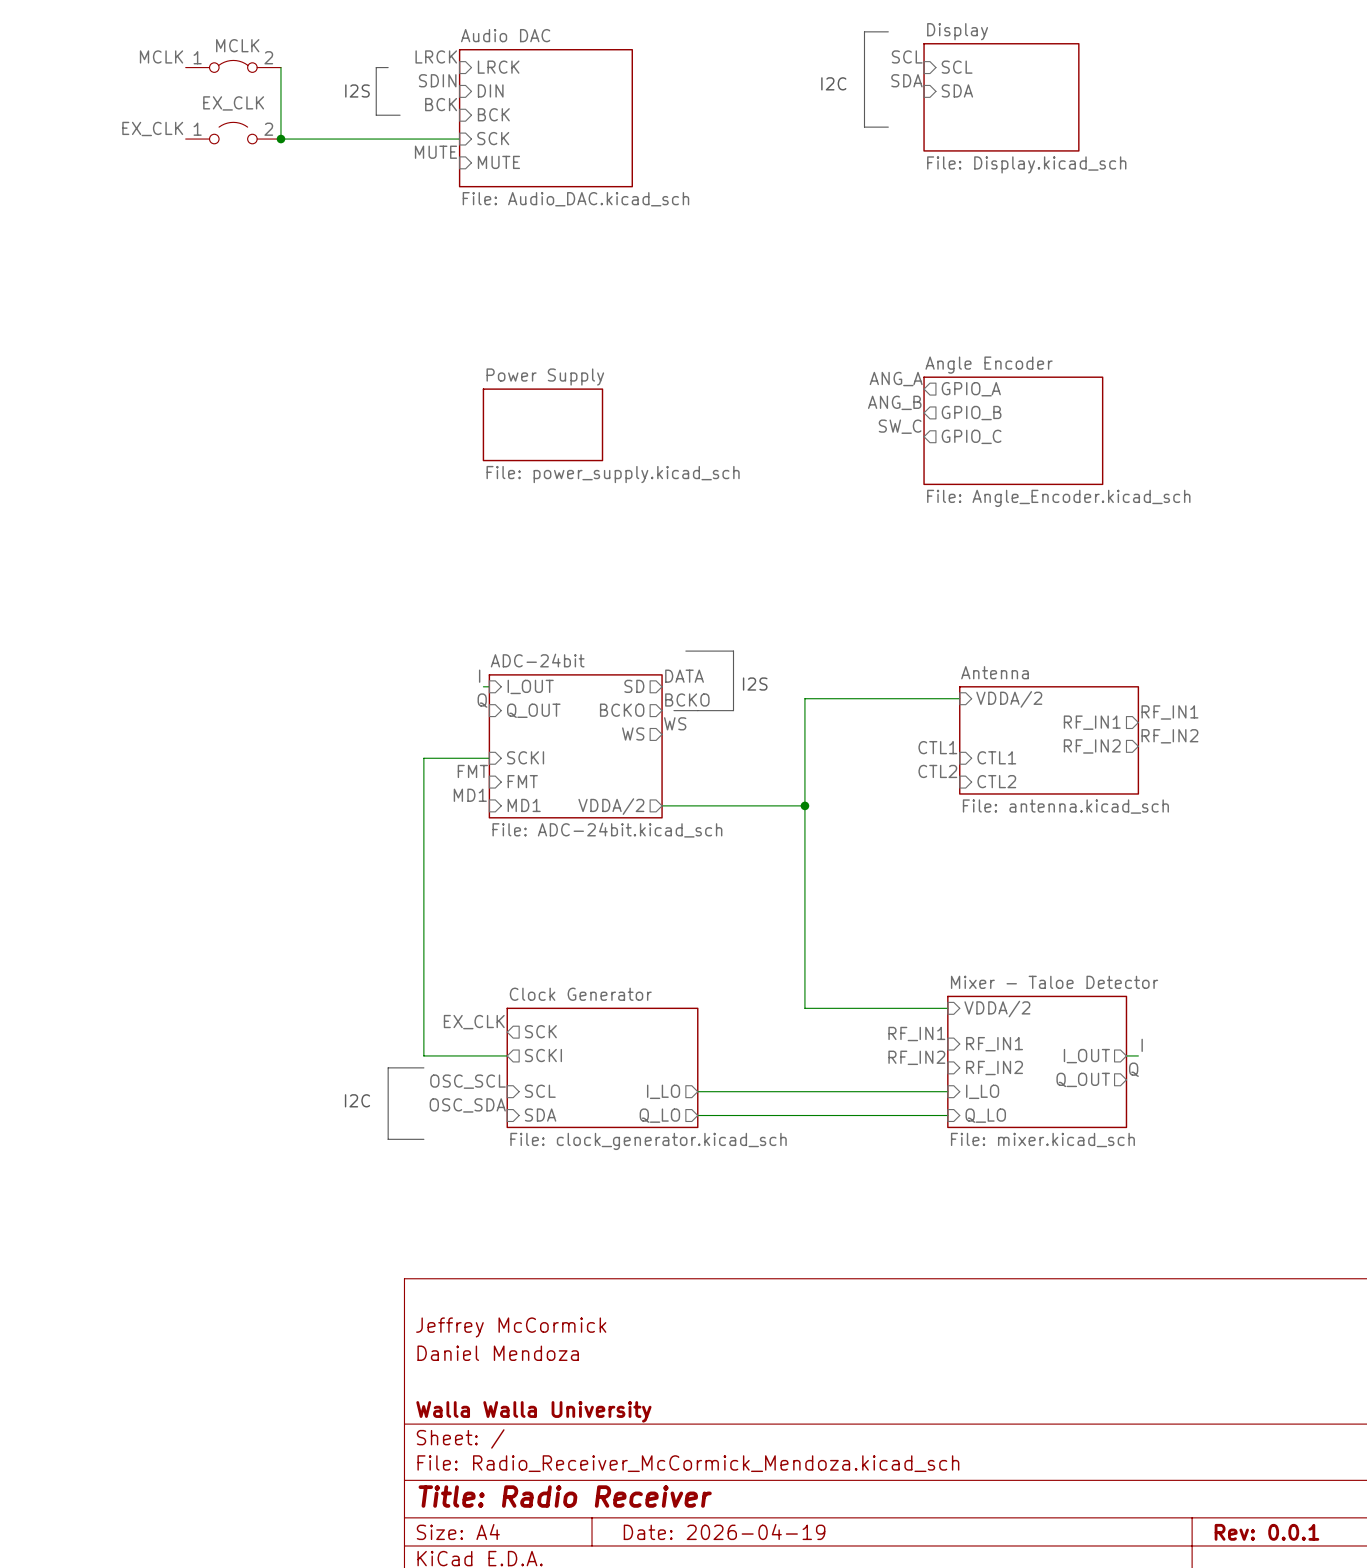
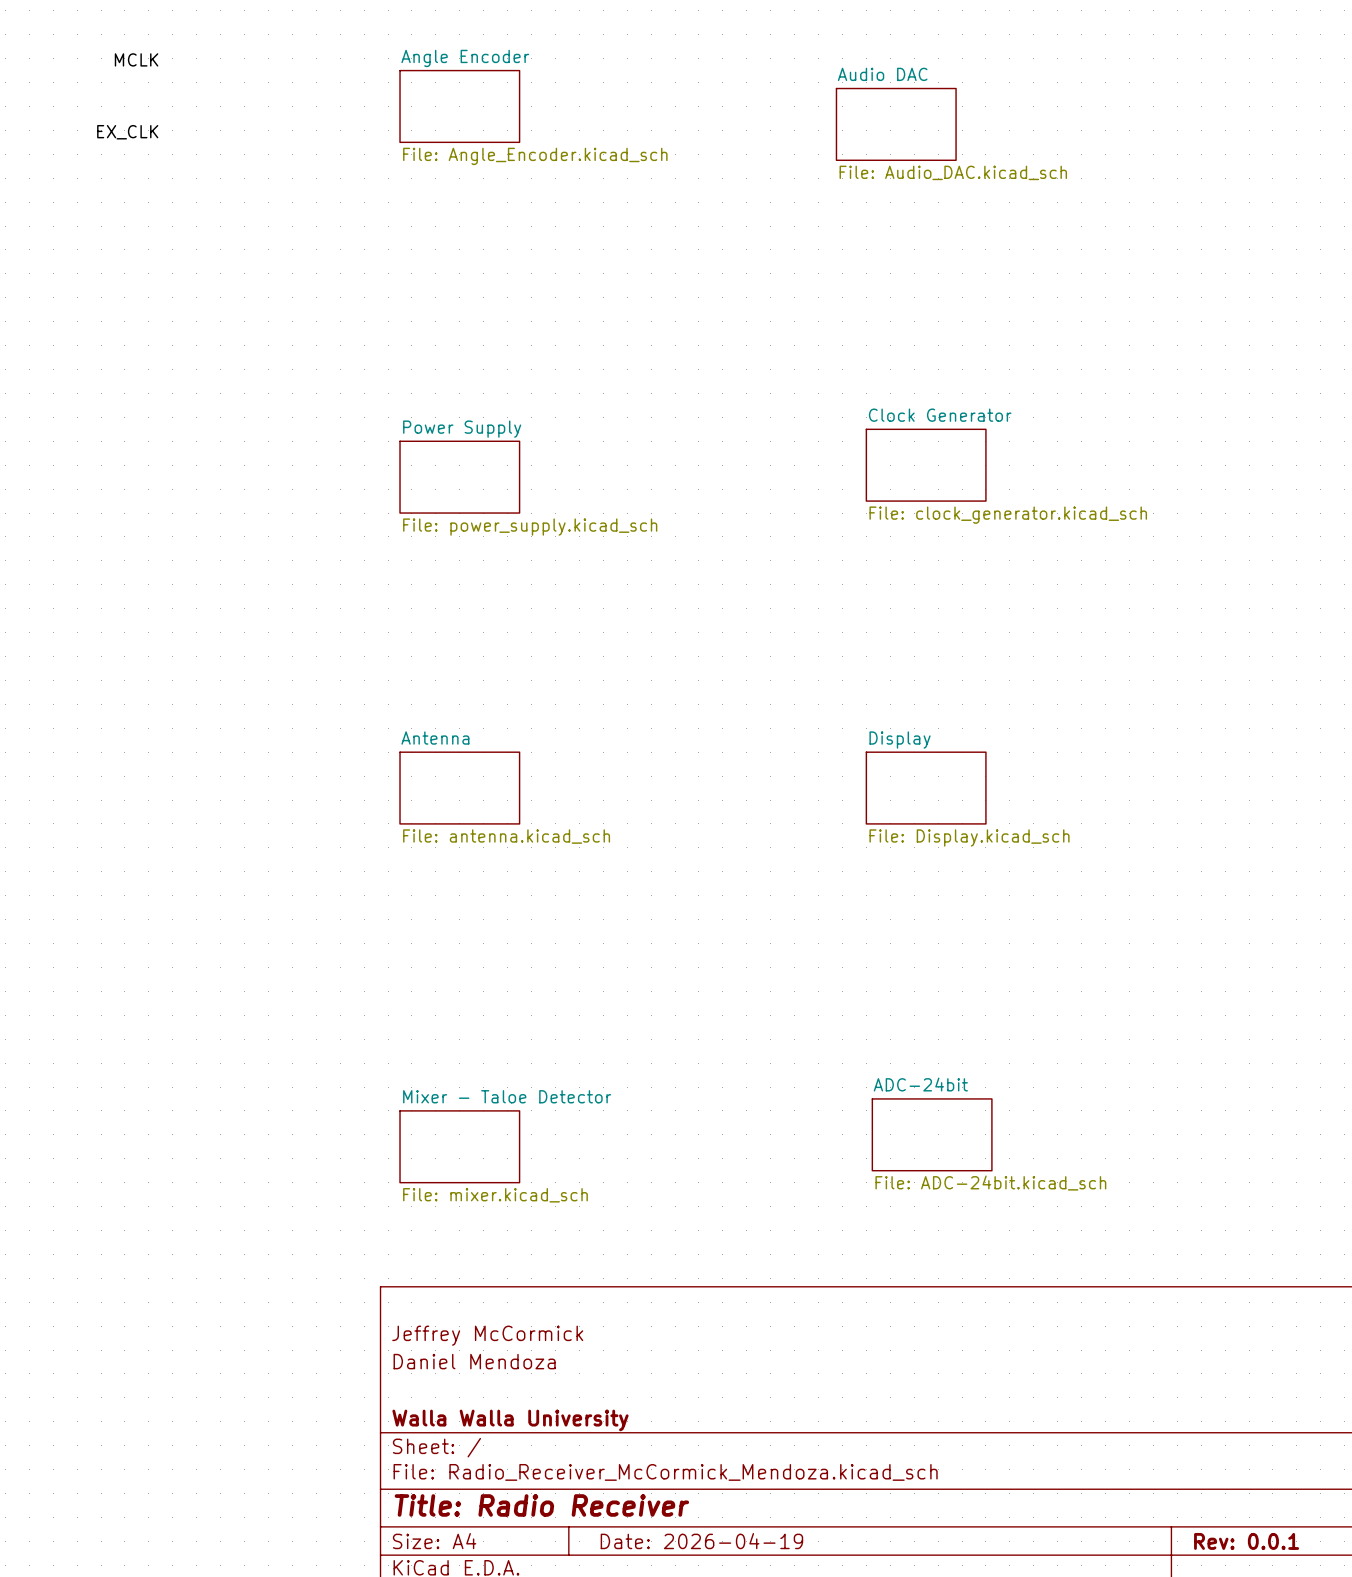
line: (888, 31) (864, 31) (864, 127) (888, 127) -> none
label: LRCK (436, 56) -> none
label: SCL (907, 56) -> none
part: MCLK (233, 66) -> none
wire: (280, 67) (280, 139) (459, 139) -> none
line: (388, 67) (376, 67) (376, 115) (400, 115) -> none
sheet pin: LRCK (498, 67) -> none
sheet pin: SCL (957, 67) -> none
label: SDIN (437, 80) -> none
label: SDA (906, 80) -> none
text: I2C (833, 83) -> none
text: I2S (357, 90) -> none
sheet pin: DIN (490, 90) -> none
sheet pin: SDA (957, 90) -> none
sheet Display: File: Display.kicad_sch (1001, 97) -> none
sheet Angle Encoder: none -> File: Angle_Encoder.kicad_sch (459, 106)
label: BCK (441, 104) -> none
sheet pin: BCK (493, 114) -> none
sheet Audio DAC: File: Audio_DAC.kicad_sch (545, 118) -> none
sheet Audio DAC: none -> File: Audio_DAC.kicad_sch (896, 124)
part: EX_CLK (233, 133) -> none
sheet pin: SCK (493, 138) -> none
junction: (280, 139) -> none
label: MUTE (435, 152) -> none
sheet pin: MUTE (498, 162) -> none
label: ANG_A (896, 379) -> none
sheet pin: GPIO_A (971, 389) -> none
label: ANG_B (894, 402) -> none
sheet pin: GPIO_B (971, 413) -> none
sheet Power Supply position: (542, 424) -> (459, 477)
label: SW_C (900, 426) -> none
sheet Angle Encoder: File: Angle_Encoder.kicad_sch (1013, 430) -> none
sheet pin: GPIO_C (971, 436) -> none
sheet Clock Generator: none -> File: clock_generator.kicad_sch (926, 465)
line: (685, 651) (733, 651) (733, 710) (673, 710) -> none
sheet ADC-24bit name position: ADC-24bit (537, 660) -> ADC-24bit (920, 1084)
sheet ADC-24bit shape: [488, 674, 663, 819] -> [871, 1098, 993, 1172]
label: I (479, 676) -> none
label: DATA (684, 676) -> none
text: I2S (755, 684) -> none
wire: (483, 686) (489, 686) -> none
sheet pin: I_OUT (530, 686) -> none
sheet pin: SD (634, 686) -> none
wire: (959, 698) (804, 698) (804, 1008) (947, 1008) -> none
sheet pin: VDDA/2 (1009, 699) -> none
label: Q (482, 700) -> none
label: BCKO (687, 700) -> none
sheet pin: Q_OUT (533, 710) -> none
sheet pin: BCKO (622, 710) -> none
label: RF_IN1 (1169, 712) -> none
sheet pin: RF_IN1 (1092, 722) -> none
label: WS (675, 723) -> none
sheet pin: WS (633, 734) -> none
label: RF_IN2 (1169, 736) -> none
sheet Antenna: File: antenna.kicad_sch (1049, 740) -> none
sheet pin: RF_IN2 (1092, 746) -> none
label: CTL1 (937, 747) -> none
sheet pin: SCKI (525, 757) -> none
sheet pin: CTL1 (996, 757) -> none
wire: (489, 758) (423, 758) (423, 1055) (507, 1055) -> none
label: FMT (472, 771) -> none
label: CTL2 (937, 771) -> none
sheet pin: FMT (522, 781) -> none
sheet pin: CTL2 (996, 781) -> none
sheet Antenna: none -> File: antenna.kicad_sch (459, 788)
sheet Display: none -> File: Display.kicad_sch (926, 788)
label: MD1 (470, 795) -> none
sheet pin: MD1 (524, 805) -> none
wire: (662, 805) (804, 805) -> none
junction: (804, 805) -> none
sheet pin: VDDA/2 (611, 806) -> none
sheet ADC-24bit value position: File: ADC-24bit.kicad_sch (607, 830) -> File: ADC-24bit.kicad_sch (990, 1183)
sheet pin: VDDA/2 (997, 1009) -> none
label: EX_CLK (474, 1022) -> none
sheet pin: SCK (540, 1031) -> none
label: RF_IN1 (916, 1034) -> none
sheet pin: RF_IN1 (994, 1044) -> none
label: I (1142, 1045) -> none
sheet pin: SCKI (543, 1055) -> none
wire: (1126, 1055) (1138, 1055) -> none
sheet pin: I_OUT (1086, 1056) -> none
label: RF_IN2 (916, 1057) -> none
sheet Mixer - Taloe Detector: File: mixer.kicad_sch (1037, 1061) -> none
line: (423, 1067) (388, 1067) (388, 1139) (423, 1139) -> none
sheet Clock Generator: File: clock_generator.kicad_sch (602, 1067) -> none
sheet pin: RF_IN2 (994, 1068) -> none
label: Q (1133, 1069) -> none
sheet pin: Q_OUT (1083, 1079) -> none
label: OSC_SCL (468, 1081) -> none
sheet pin: SCL (540, 1091) -> none
sheet pin: I_LO (663, 1091) -> none
wire: (697, 1091) (947, 1091) -> none
sheet pin: I_LO (982, 1091) -> none
text: I2C (357, 1100) -> none
label: OSC_SDA (467, 1105) -> none
sheet pin: SDA (540, 1115) -> none
sheet pin: Q_LO (659, 1115) -> none
wire: (697, 1115) (947, 1115) -> none
sheet pin: Q_LO (985, 1115) -> none
sheet Mixer - Taloe Detector: none -> File: mixer.kicad_sch (459, 1146)

